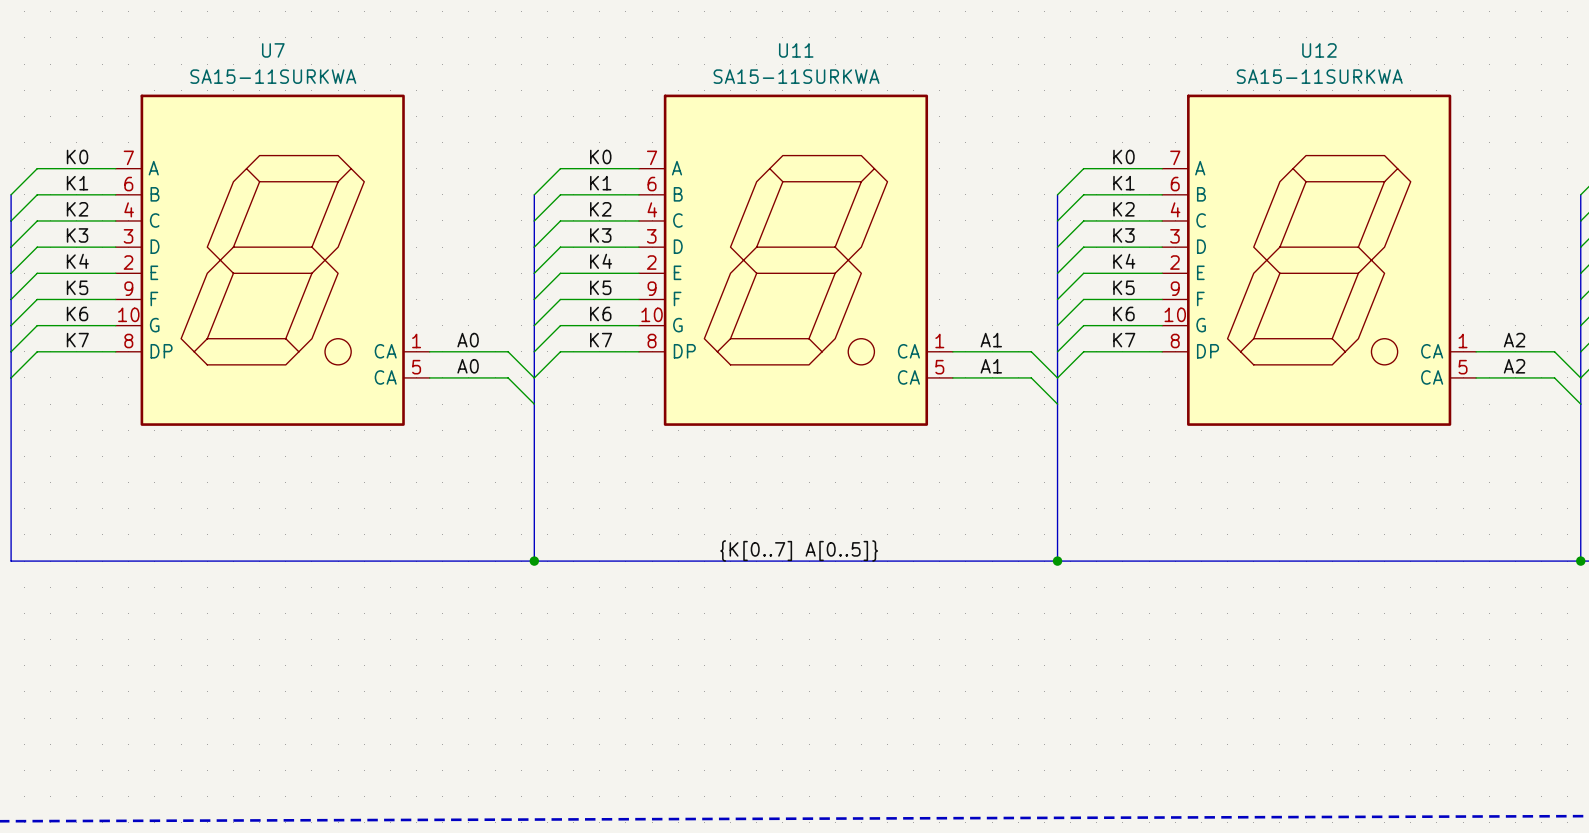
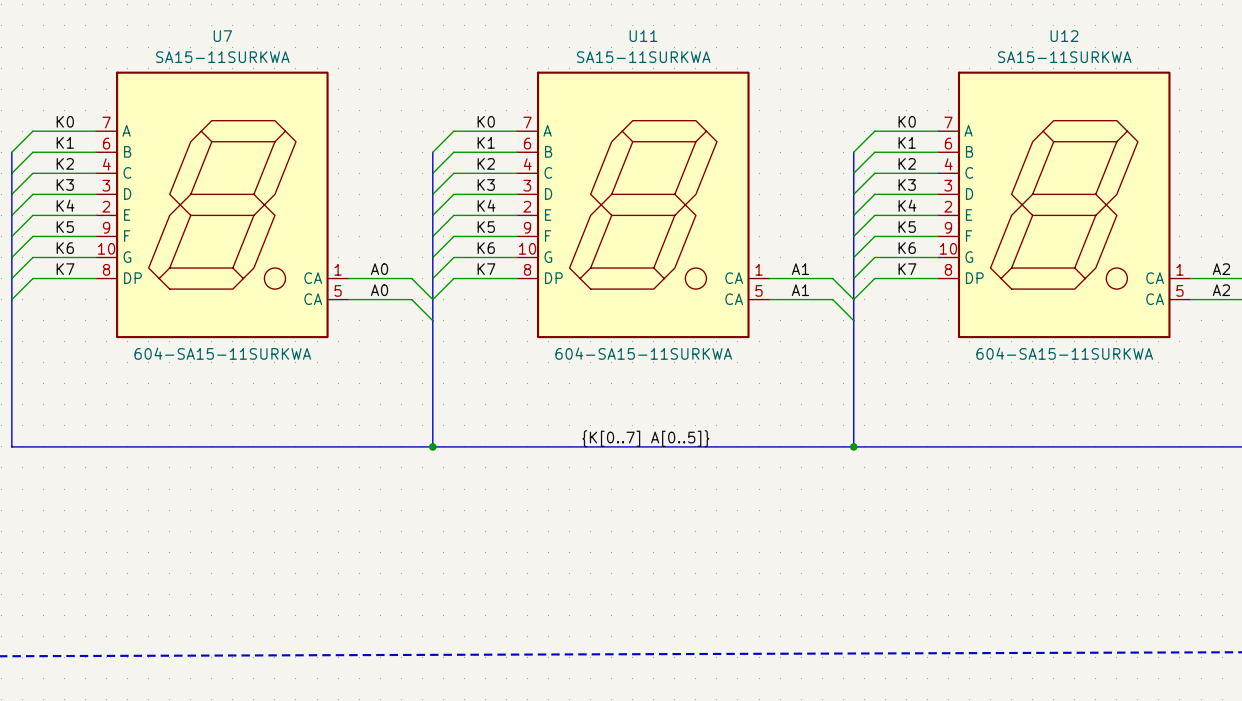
U7 text: none -> 604-SA15-11SURKWA (222, 353)
U11 text: none -> 604-SA15-11SURKWA (643, 353)
U12 text: none -> 604-SA15-11SURKWA (1064, 353)

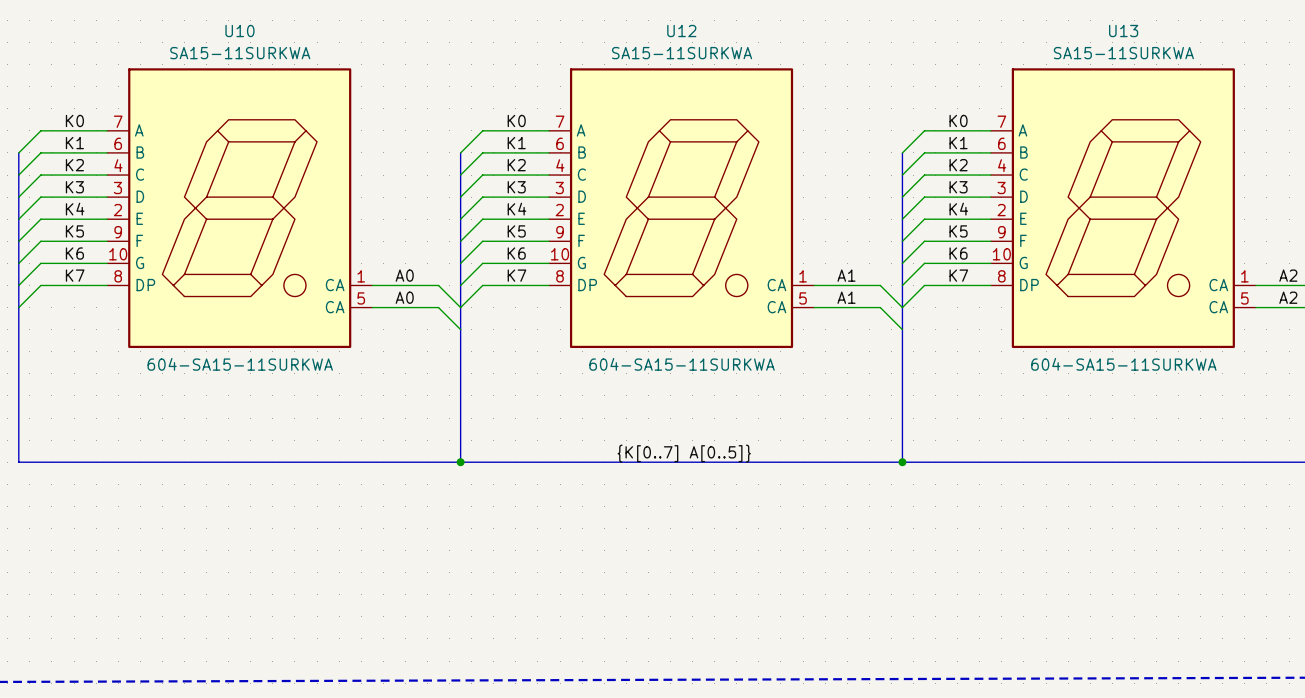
U7 name: U7 (222, 36) -> U10 (239, 31)
U11 name: U11 (643, 36) -> U12 (681, 31)
U12 name: U12 (1064, 36) -> U13 (1123, 31)

